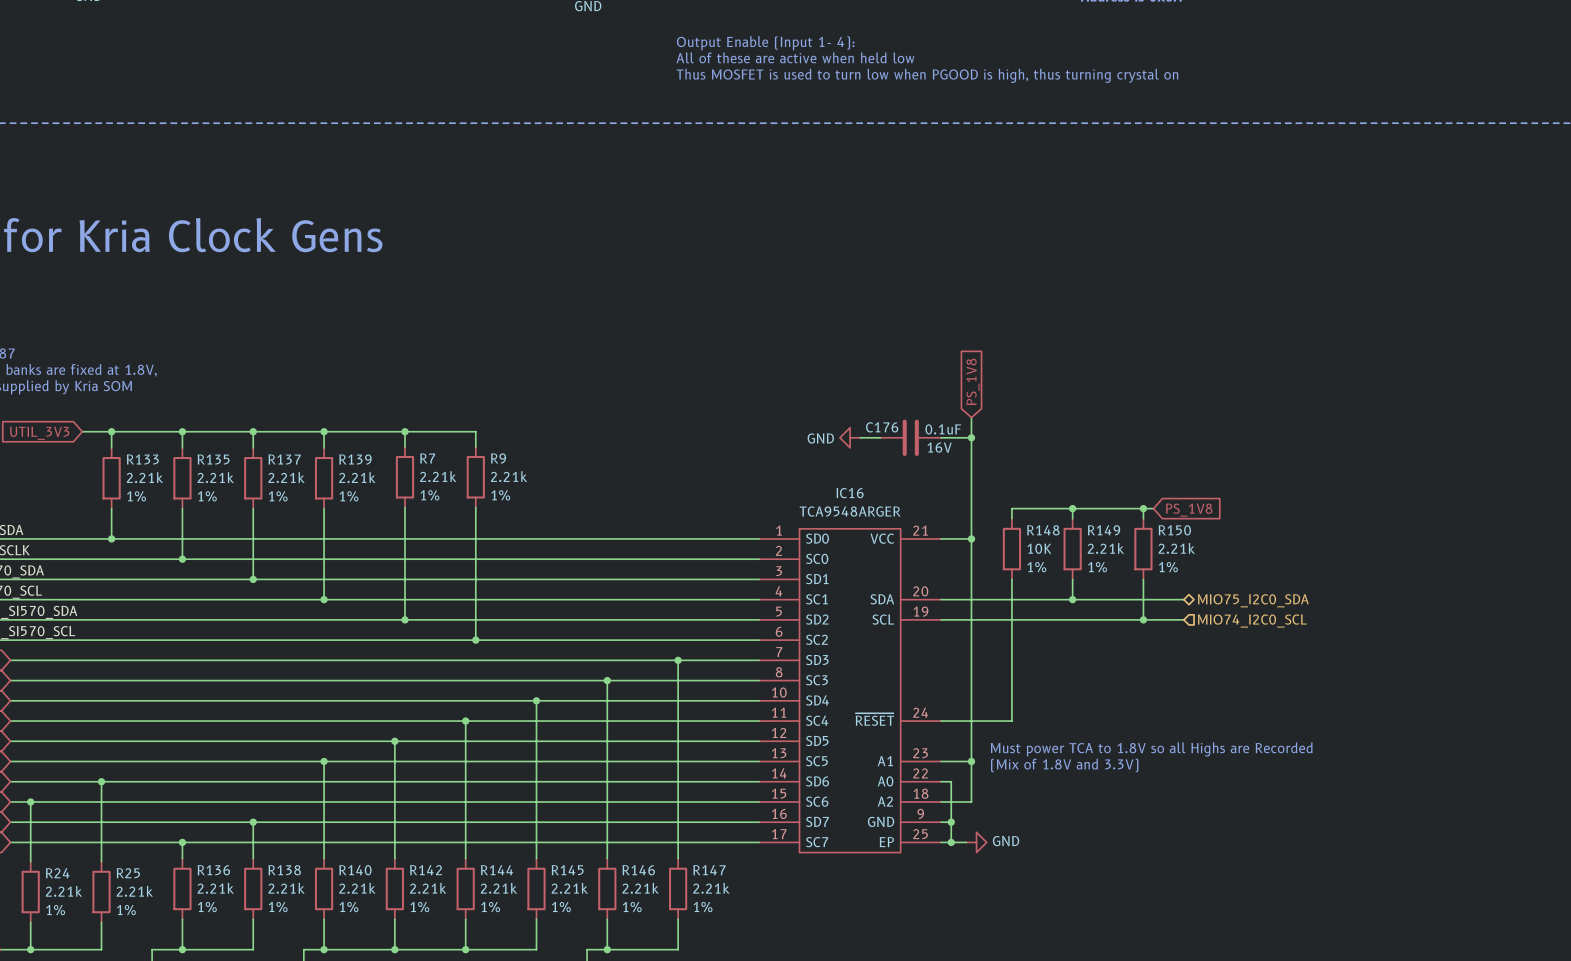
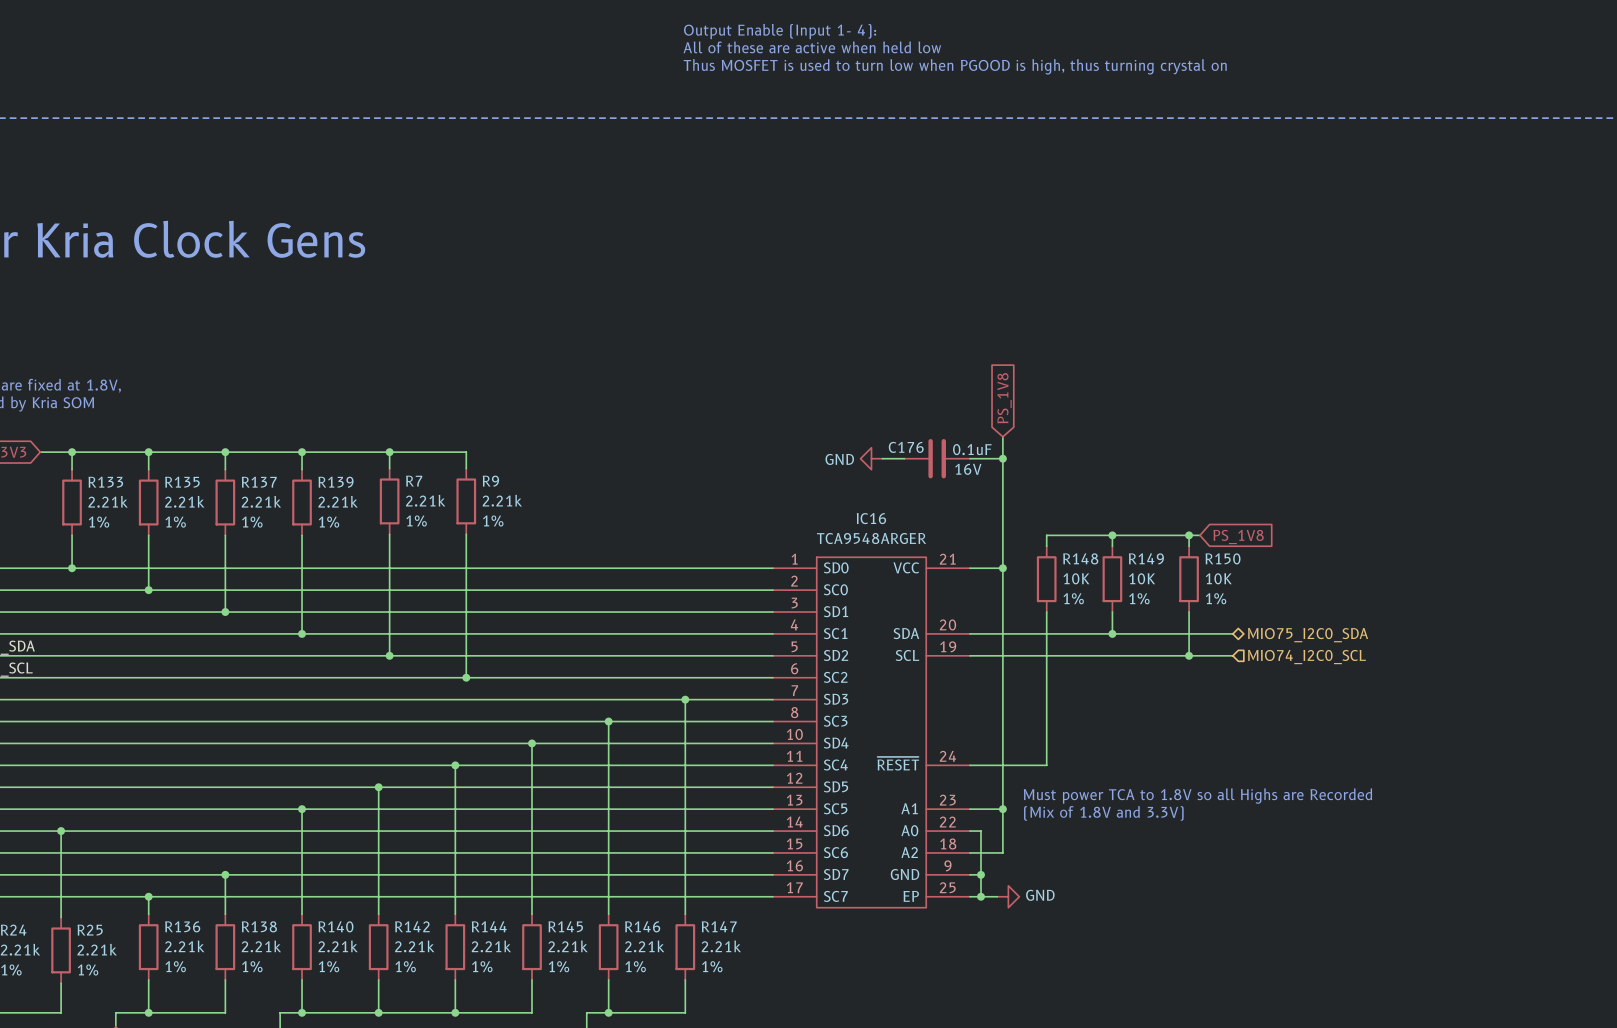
R149 value: 2.21k (1105, 548) -> 10K (1142, 578)
R150 value: 2.21k (1176, 548) -> 10K (1218, 578)

